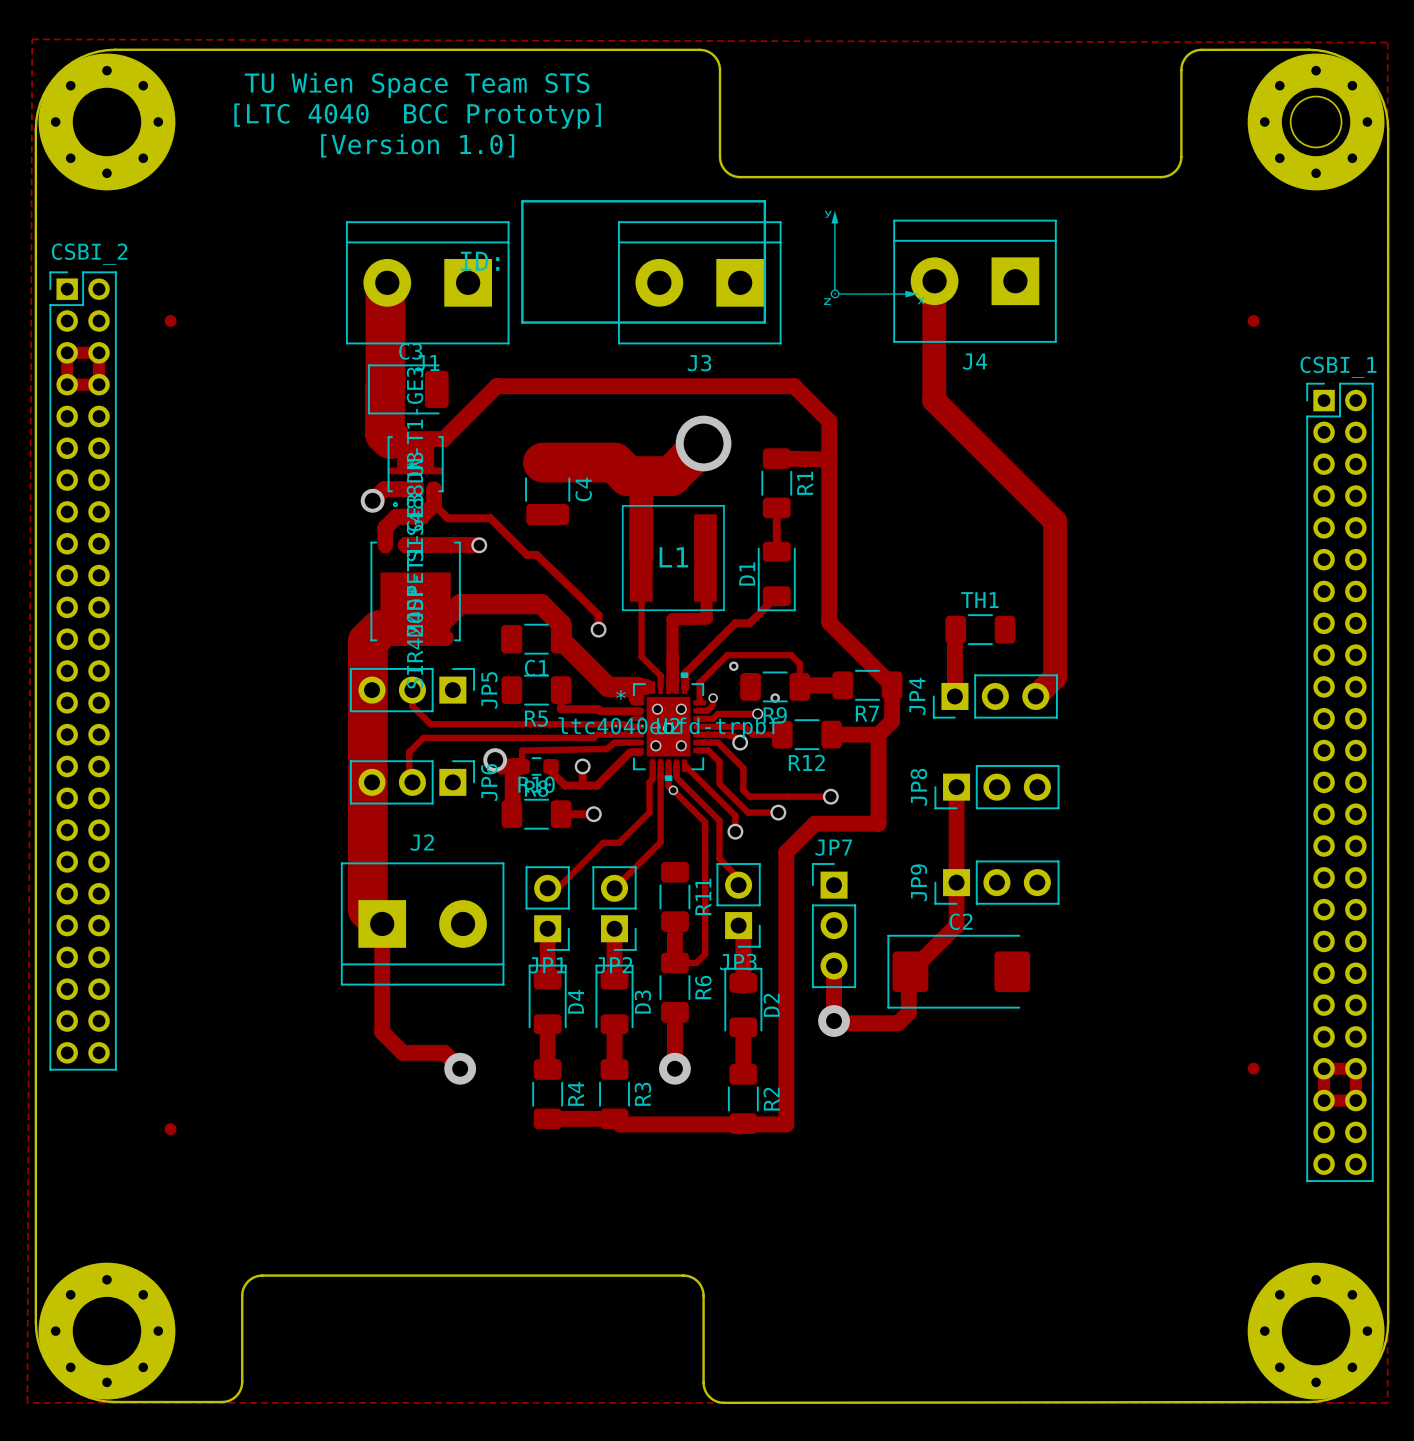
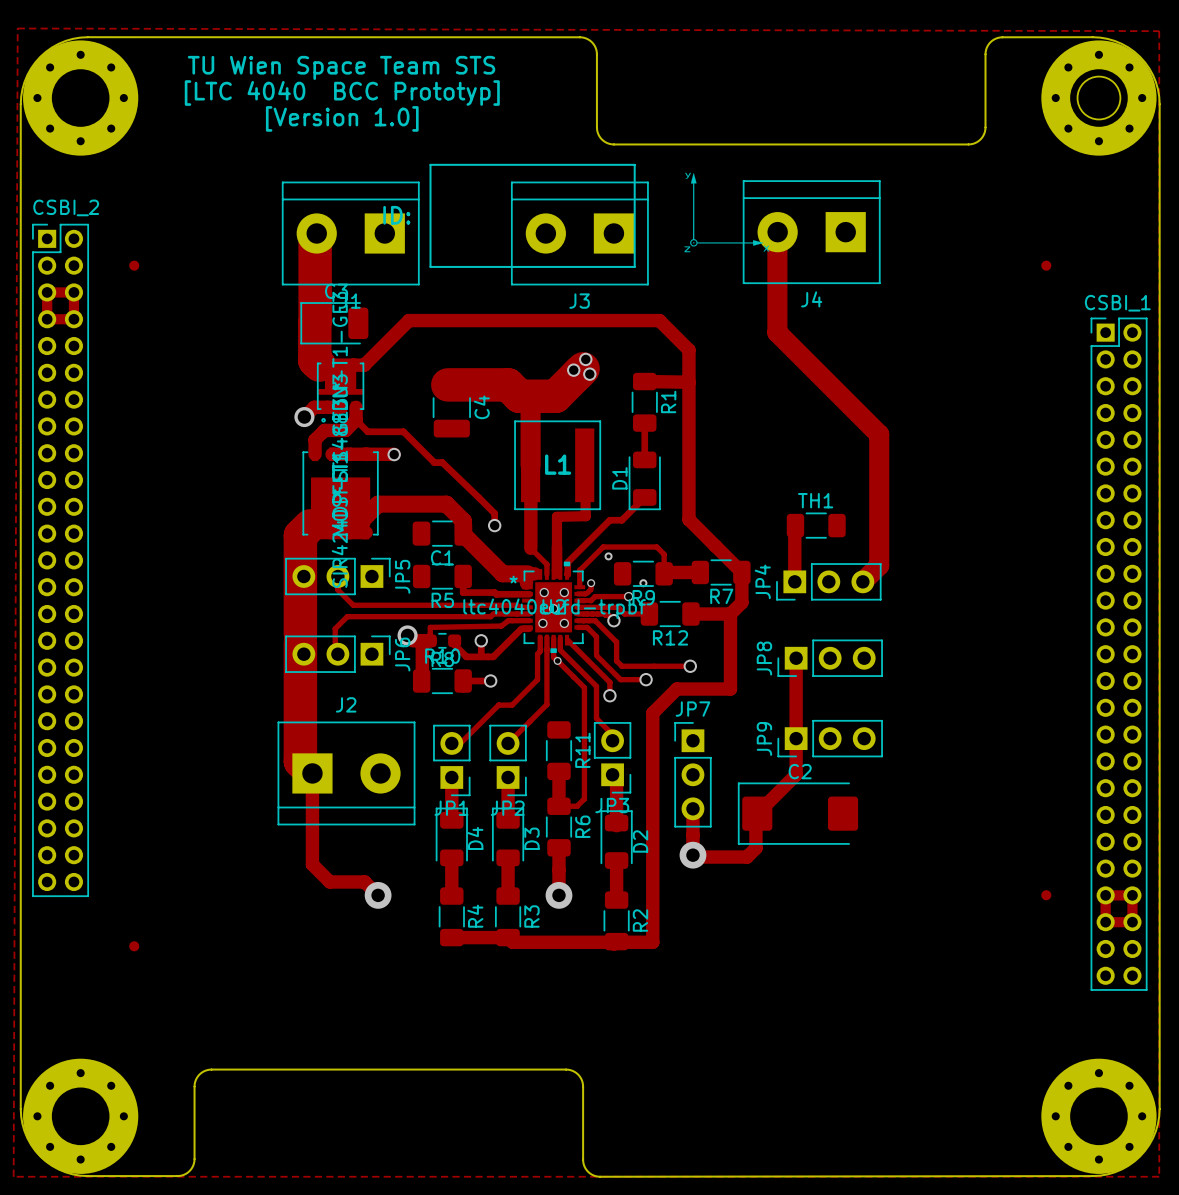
via: none -> (585, 359)
via: (703, 443) -> none
via: none -> (573, 370)
via: none -> (589, 374)
track width: thin (641, 558) (641, 656) -> thick (530, 465) (530, 548)

